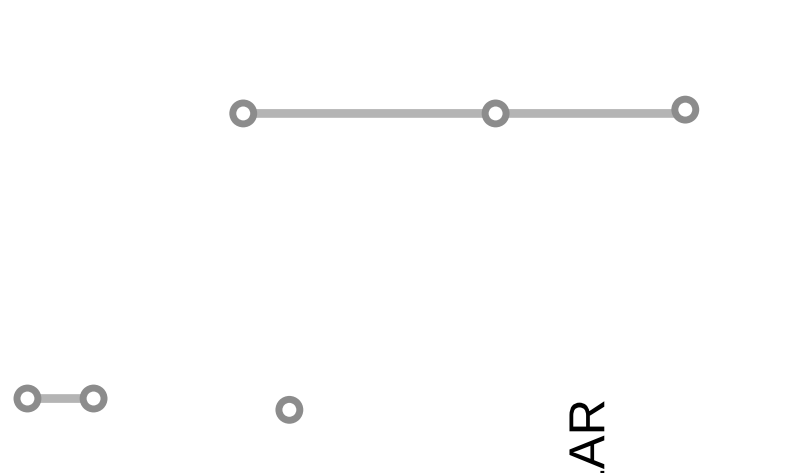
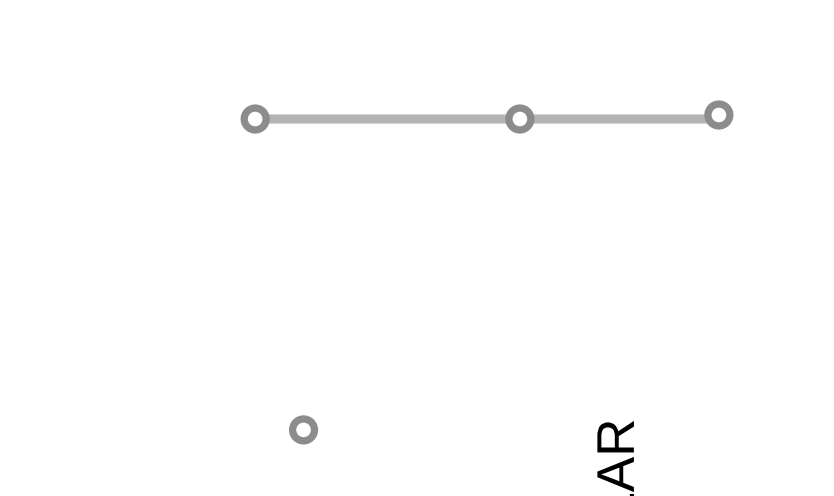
via: (27, 398) -> none
track: (93, 398) (27, 398) -> none
via: (93, 398) -> none

